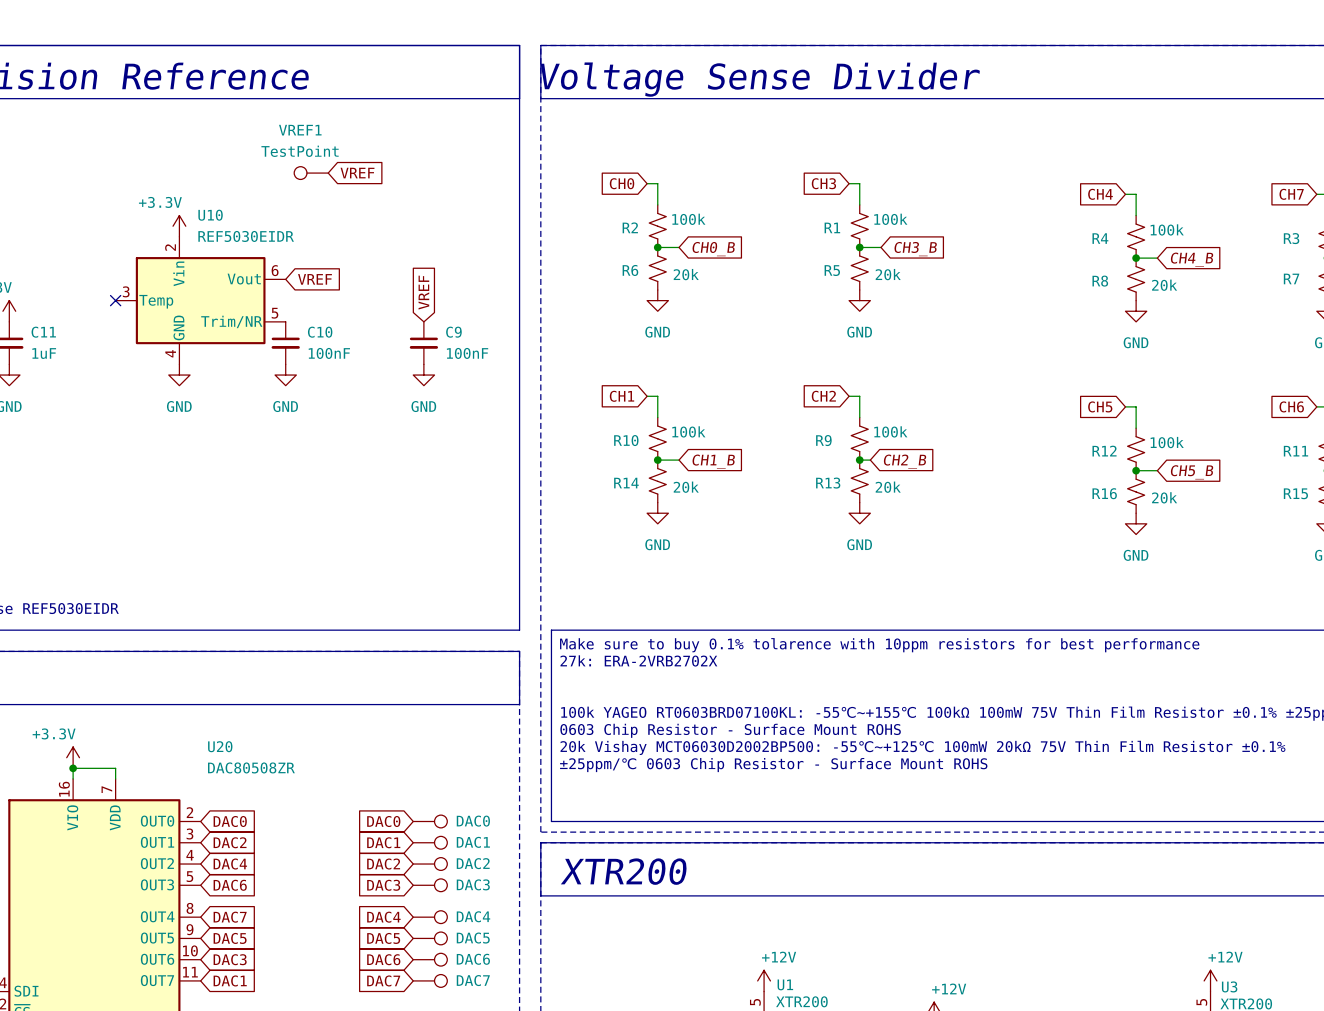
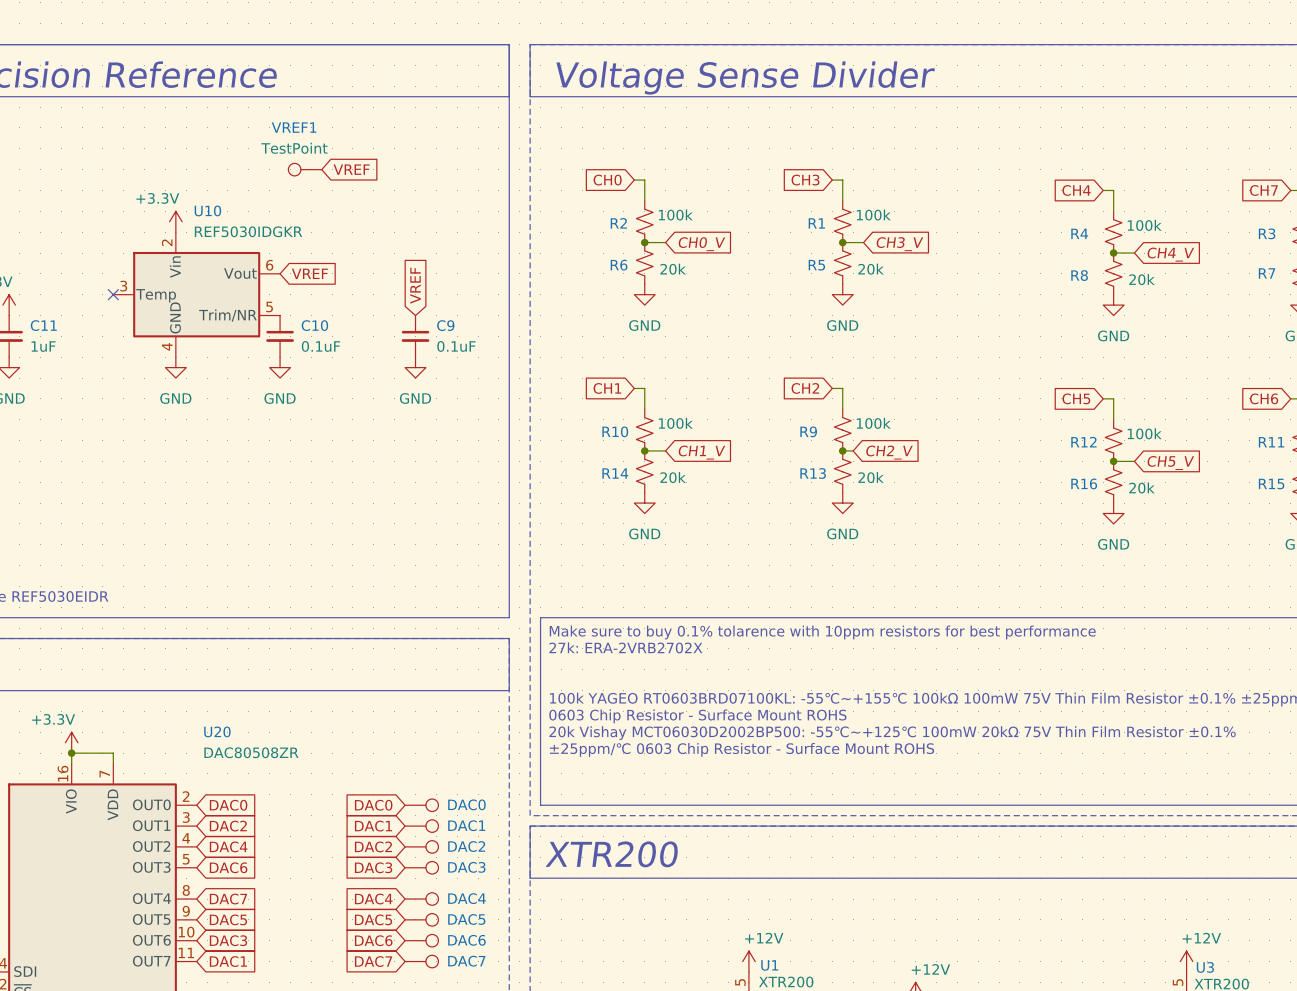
U10 value: REF5030EIDR (246, 236) -> REF5030IDGKR (248, 231)
global label: CH0_B (713, 249) -> CH0_V (701, 244)
global label: CH3_B (915, 249) -> CH3_V (899, 244)
global label: CH4_B (1191, 259) -> CH4_V (1170, 254)
C10 value: 100nF (329, 353) -> 0.1uF (320, 346)
C9 value: 100nF (467, 353) -> 0.1uF (456, 346)
global label: CH1_B (713, 461) -> CH1_V (701, 452)
global label: CH2_B (904, 461) -> CH2_V (889, 452)
global label: CH5_B (1191, 472) -> CH5_V (1170, 462)

